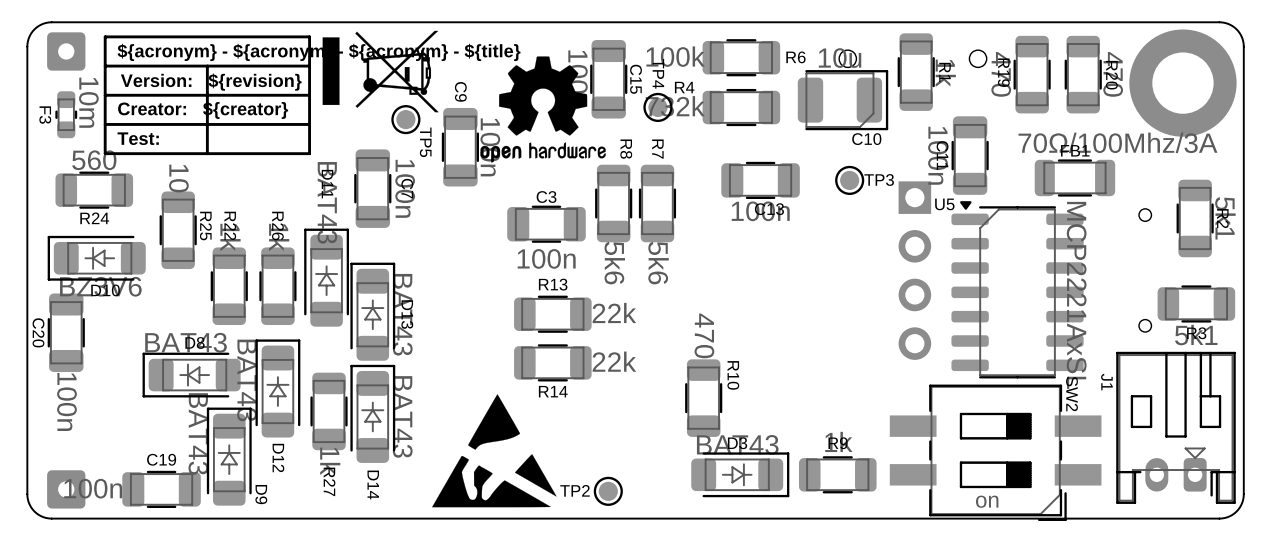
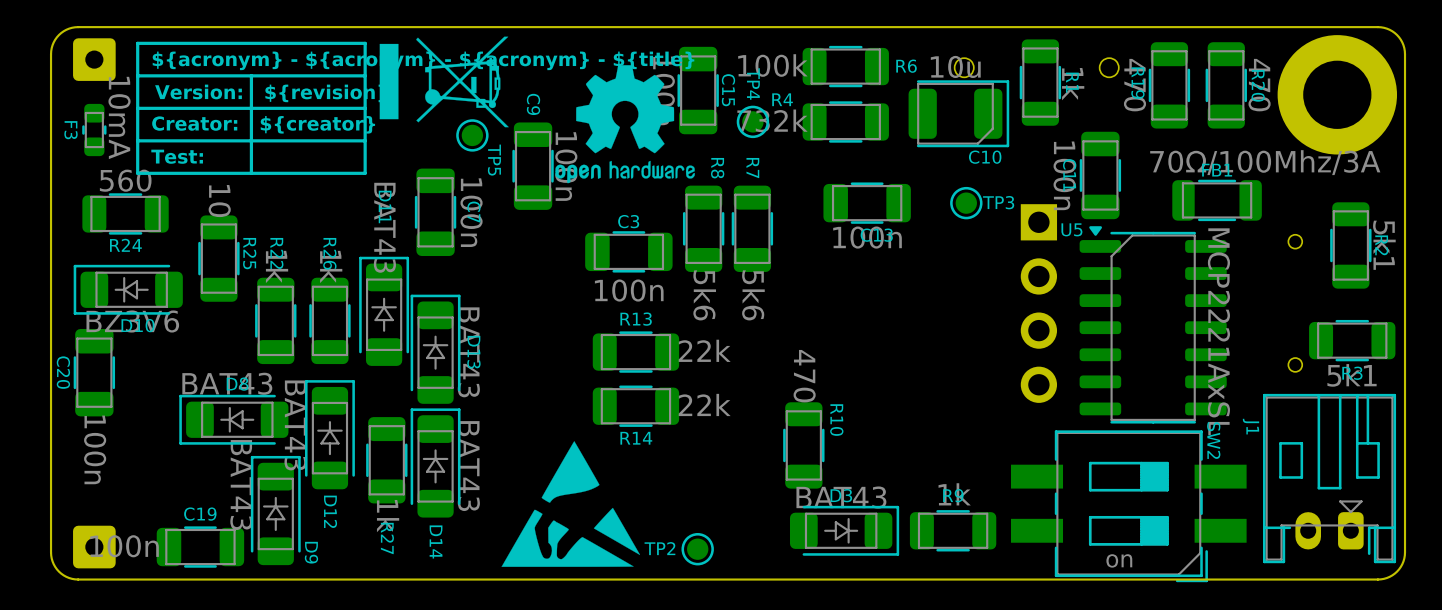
F3 value: 10m (88, 102) -> 10mA (119, 117)

